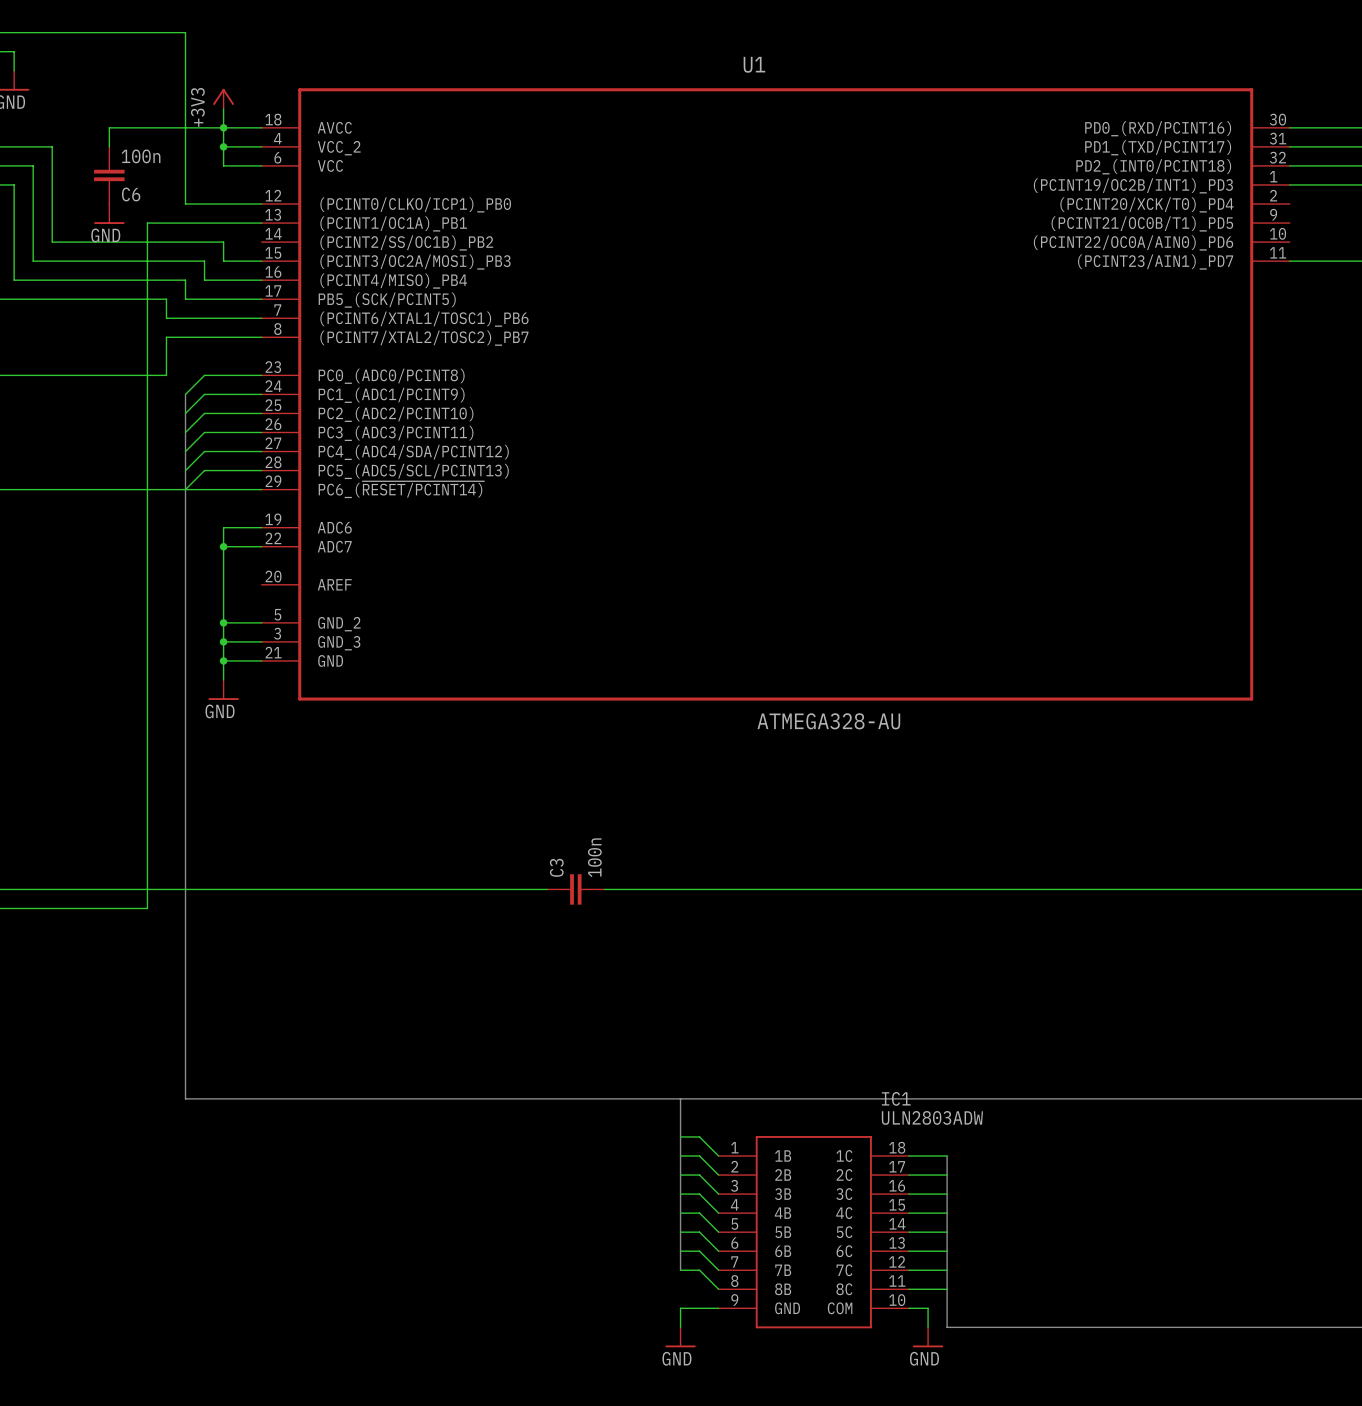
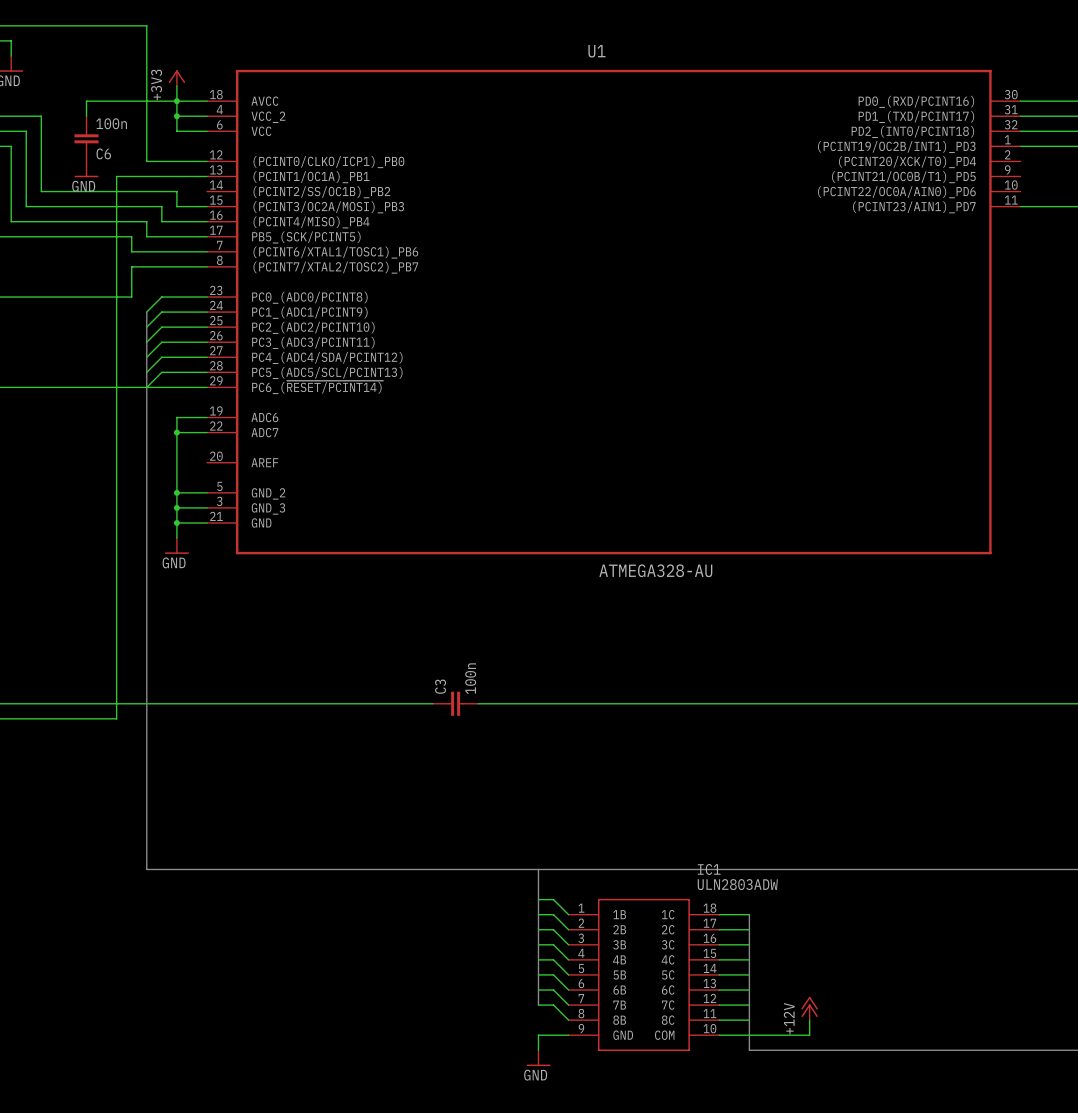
power symbol: none -> +12V (809, 1008)
wire: (928, 1308) (928, 1327) -> (734, 1035) (809, 1035) (809, 1020)
power symbol: GND (928, 1337) -> none

